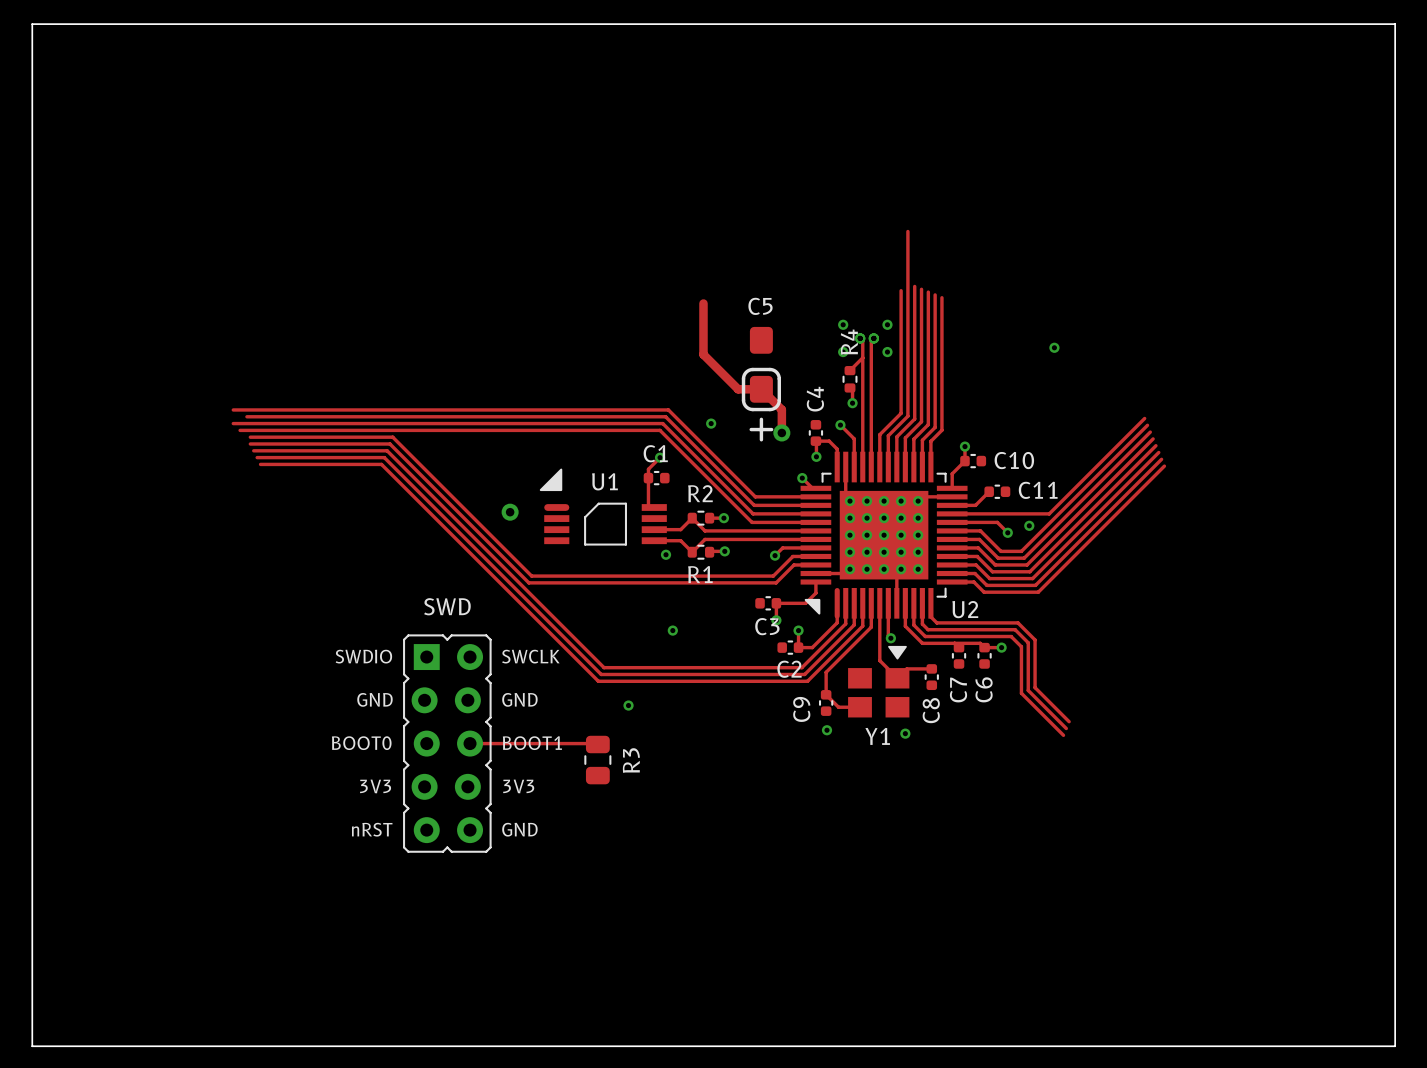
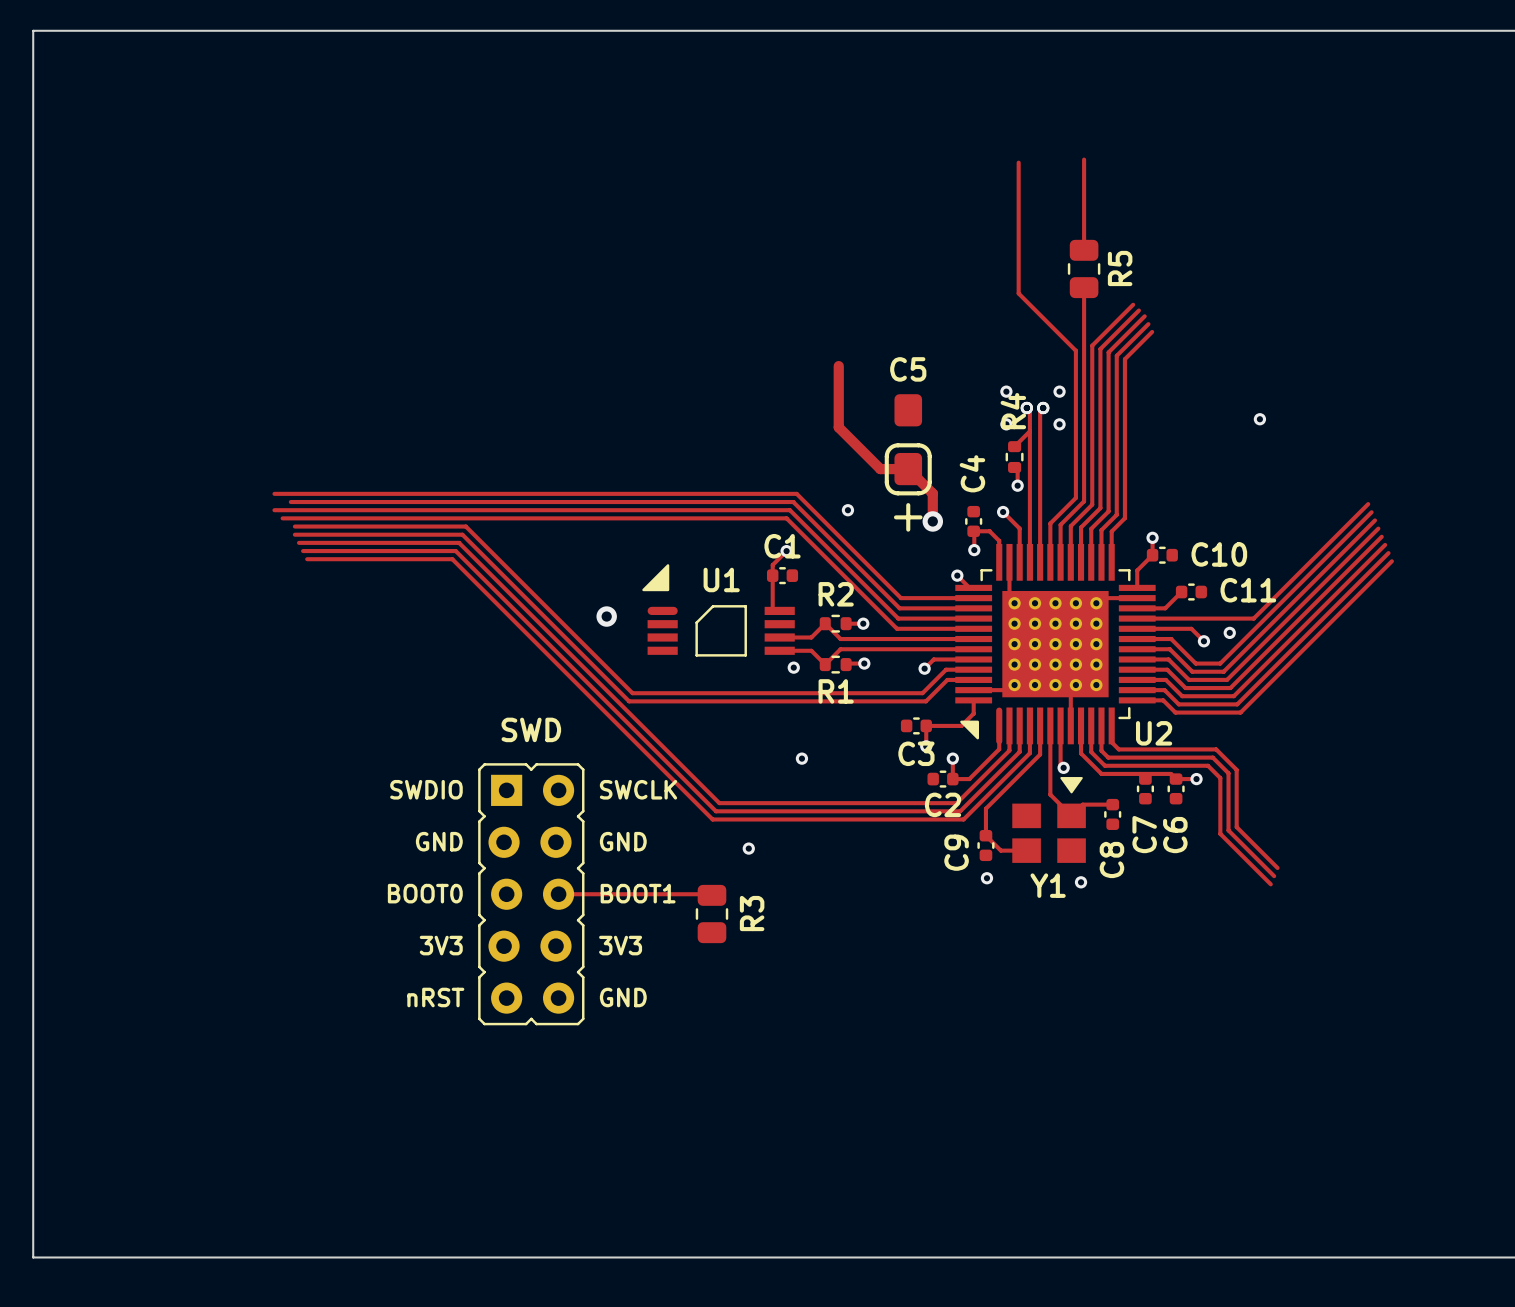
track: none -> (1084, 159) (1084, 250)
track: none -> (1018, 162) (1018, 293) (1075, 350)
R5: none -> (1084, 268)
track: none -> (1133, 304) (1092, 345)
track: none -> (1138, 310) (1100, 349)
track: none -> (1144, 316) (1108, 352)
track: none -> (1148, 324) (1116, 355)
track: none -> (1152, 331) (1124, 359)

